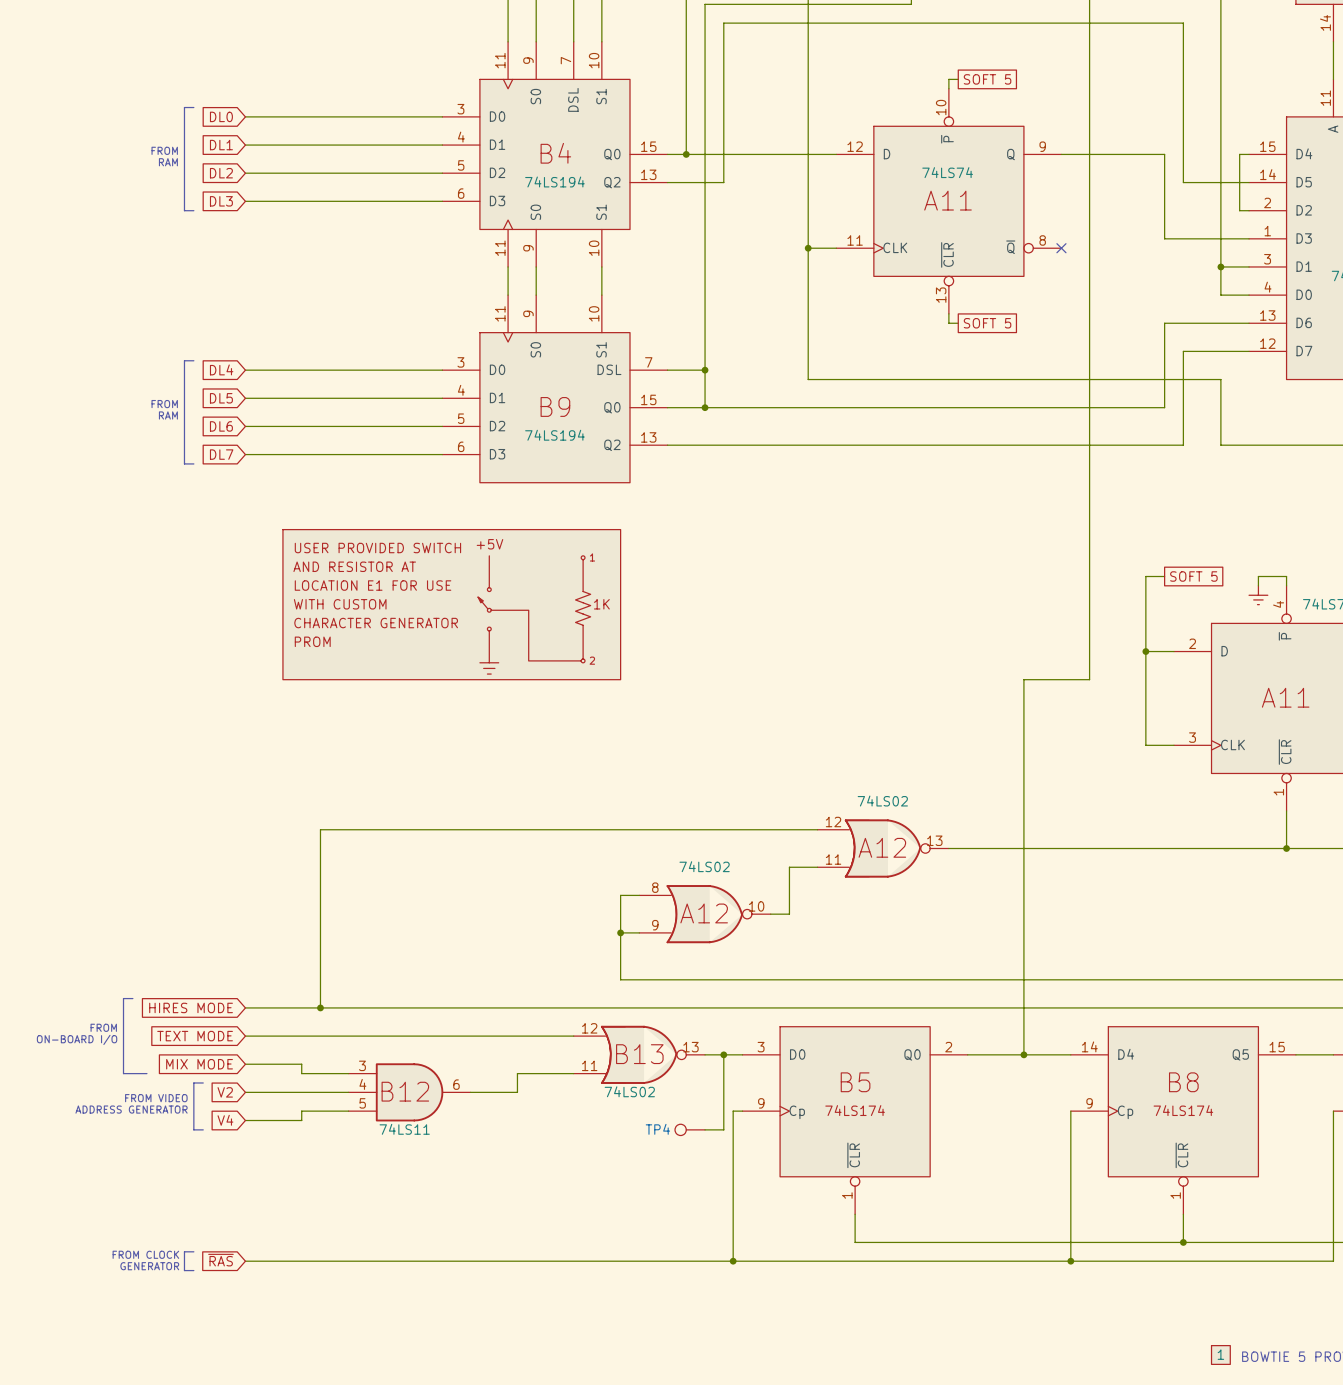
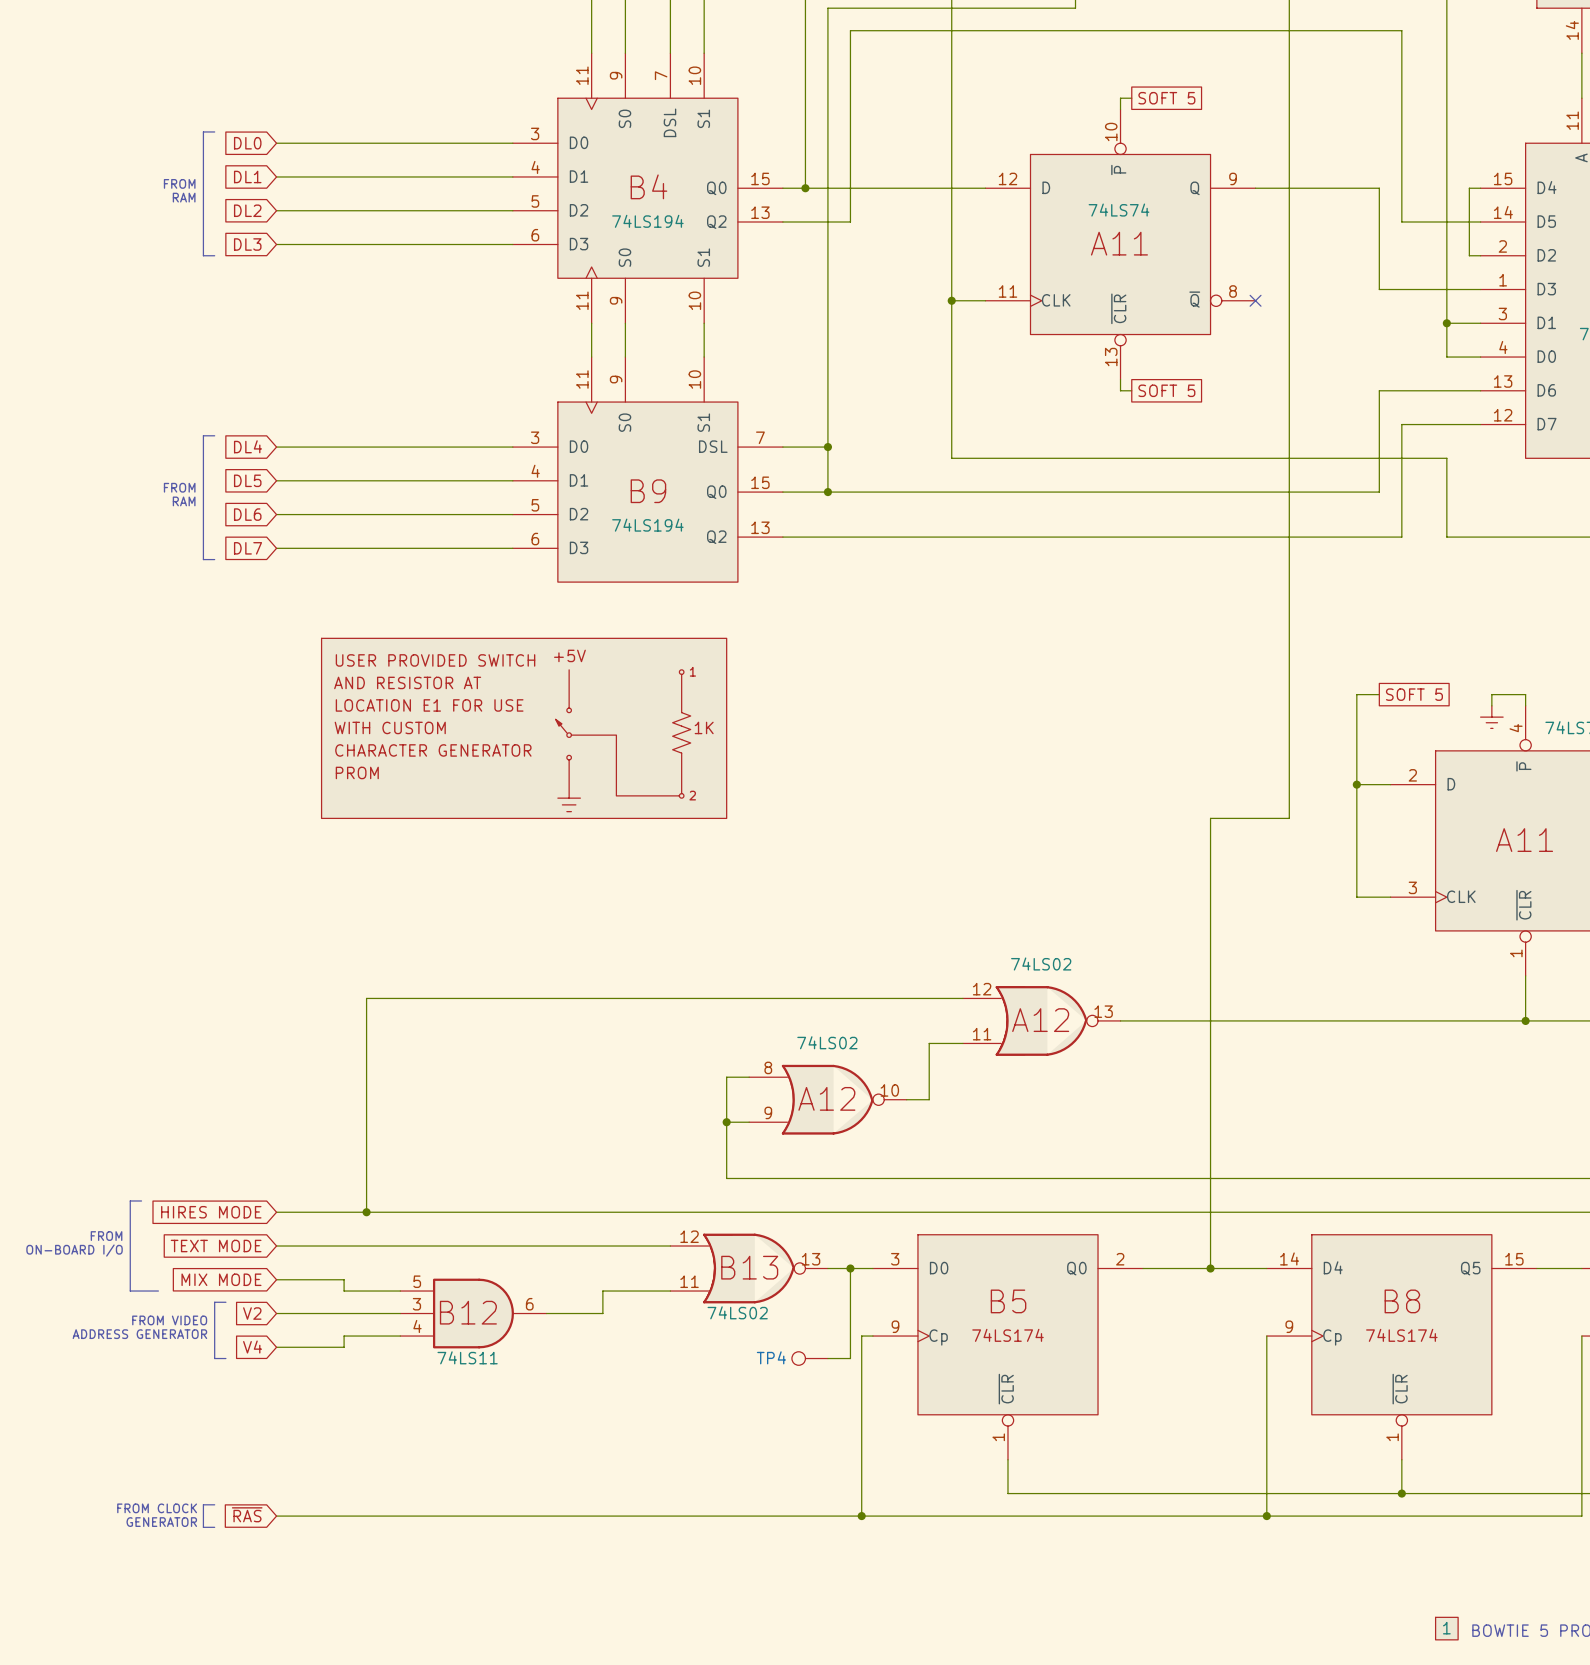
part pin number: 3 (362, 1065) -> 5 (417, 1281)
part pin number: 4 (362, 1084) -> 3 (416, 1304)
part pin number: 5 (362, 1103) -> 4 (417, 1326)

